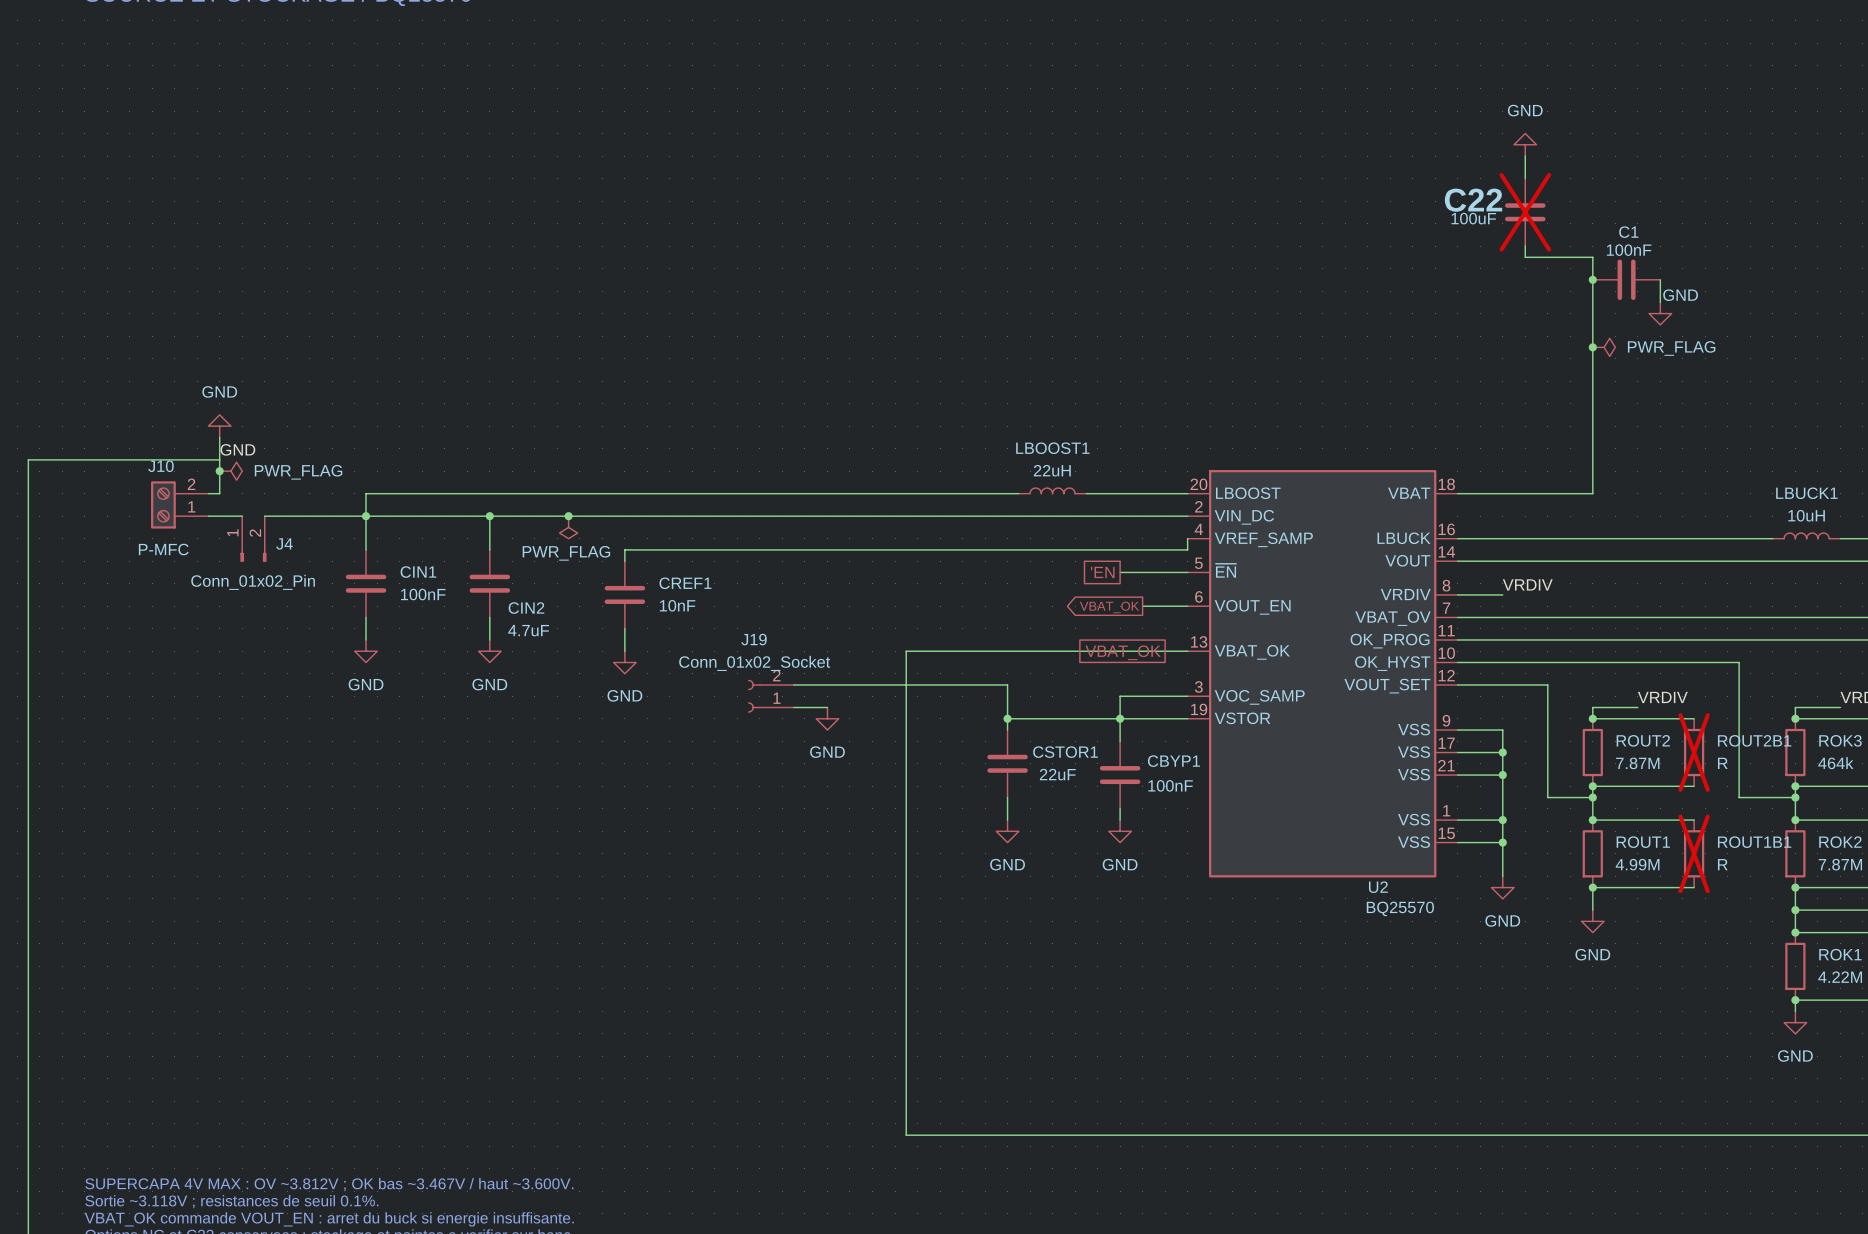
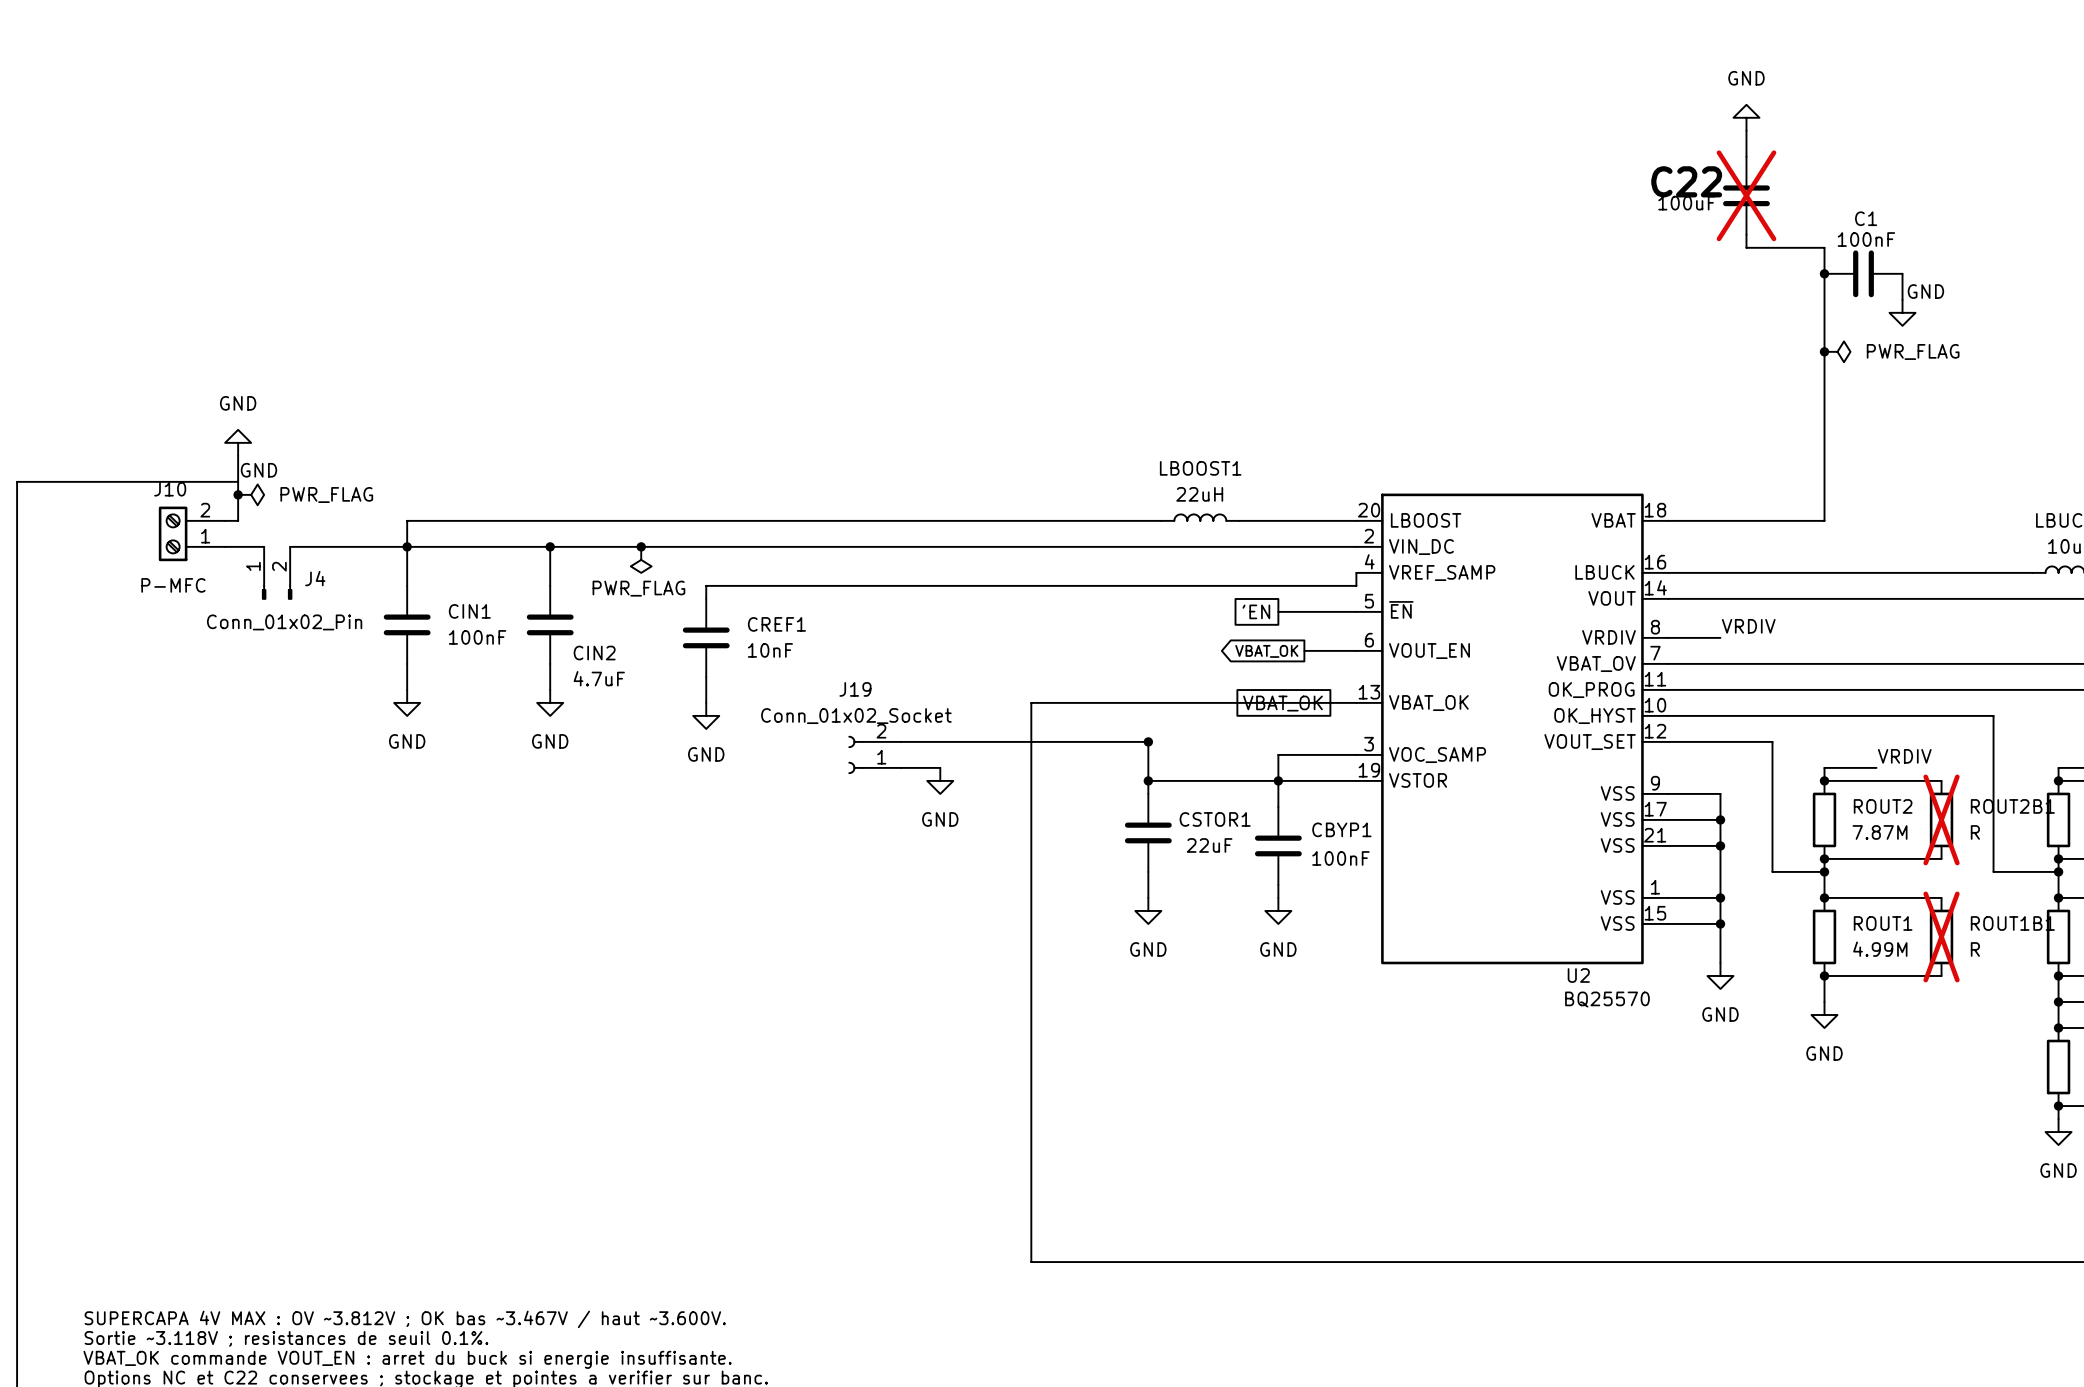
junction: none -> (1148, 741)

